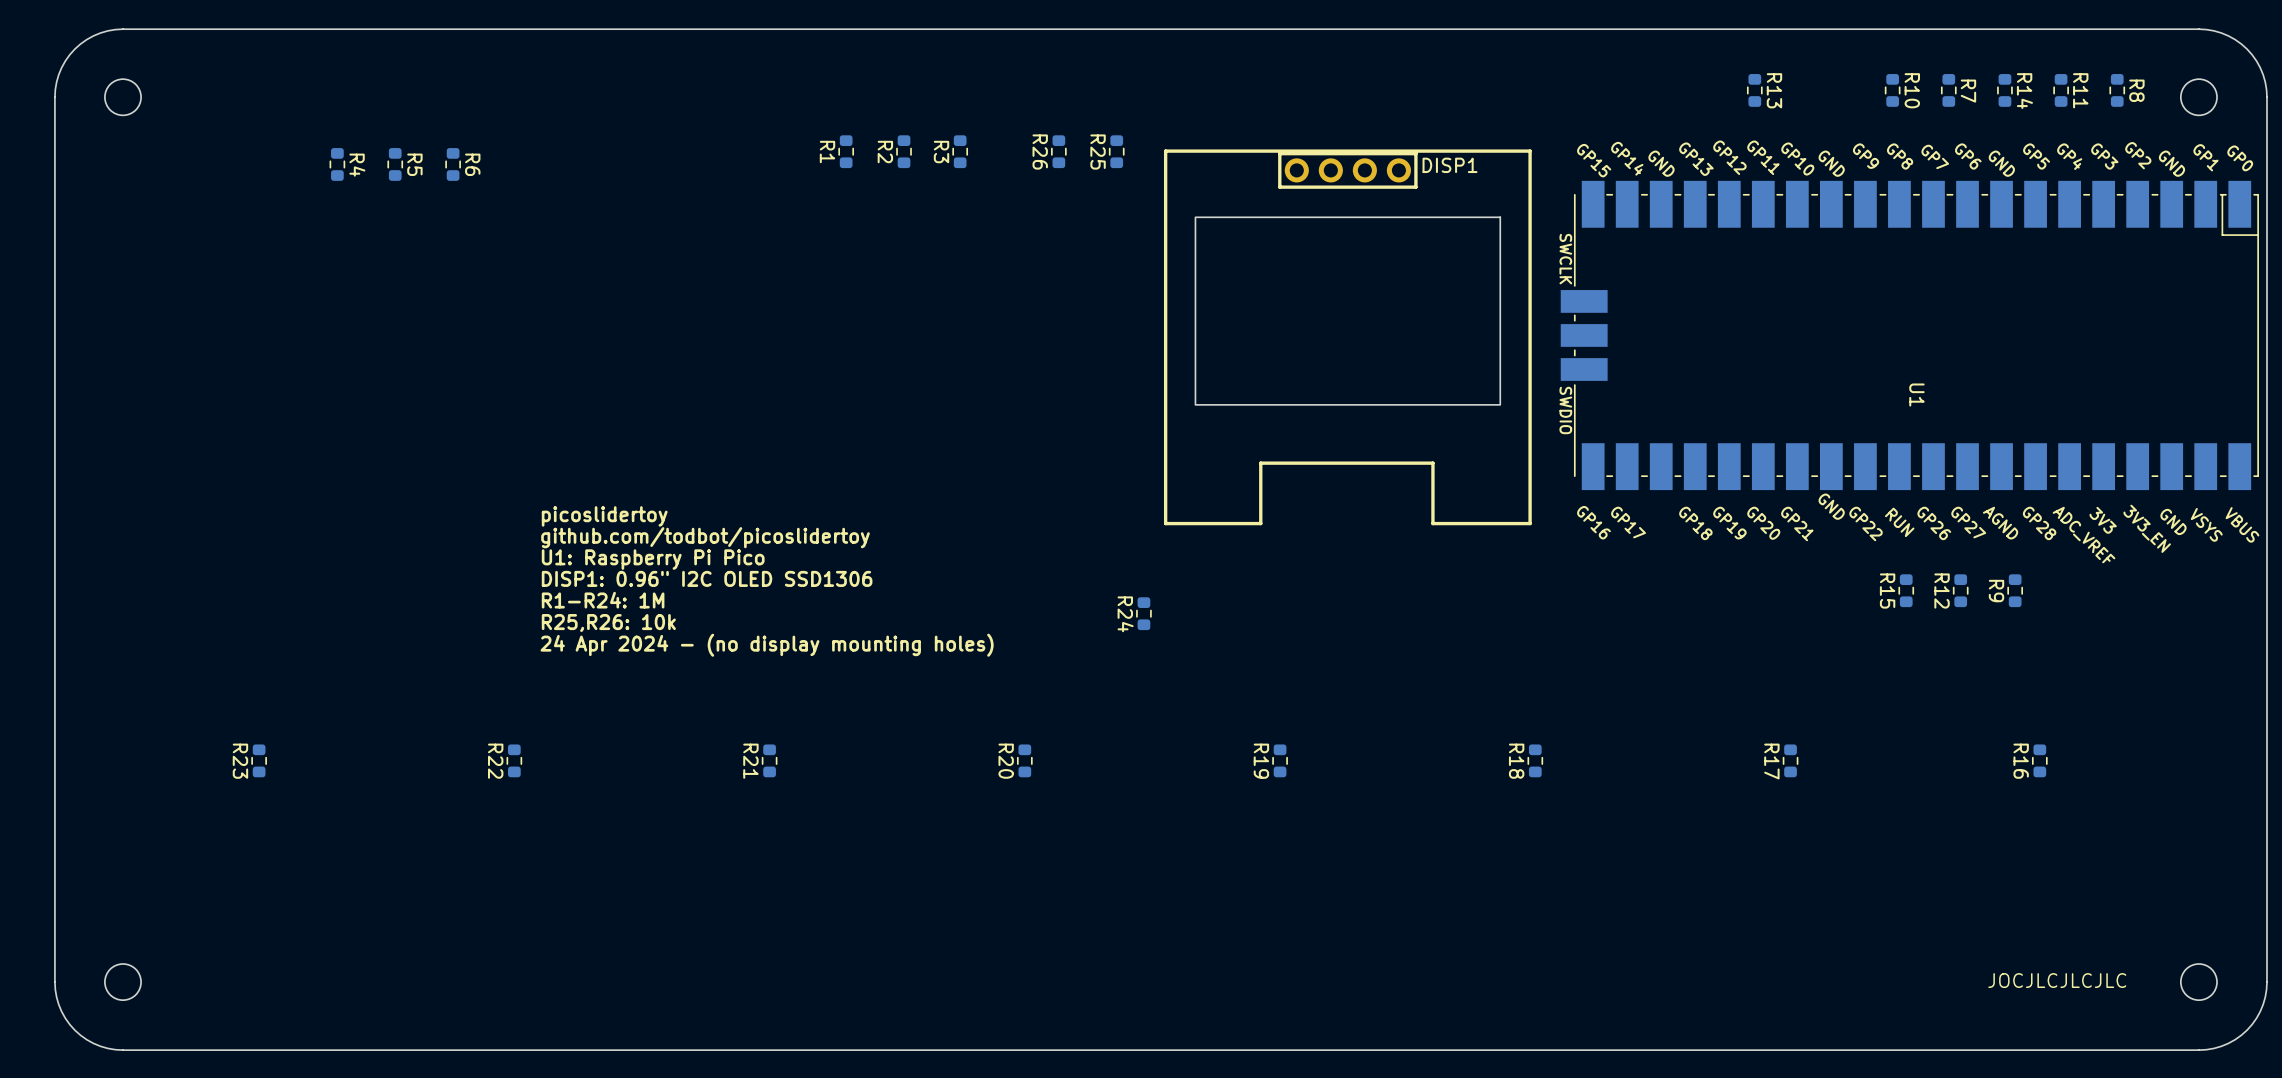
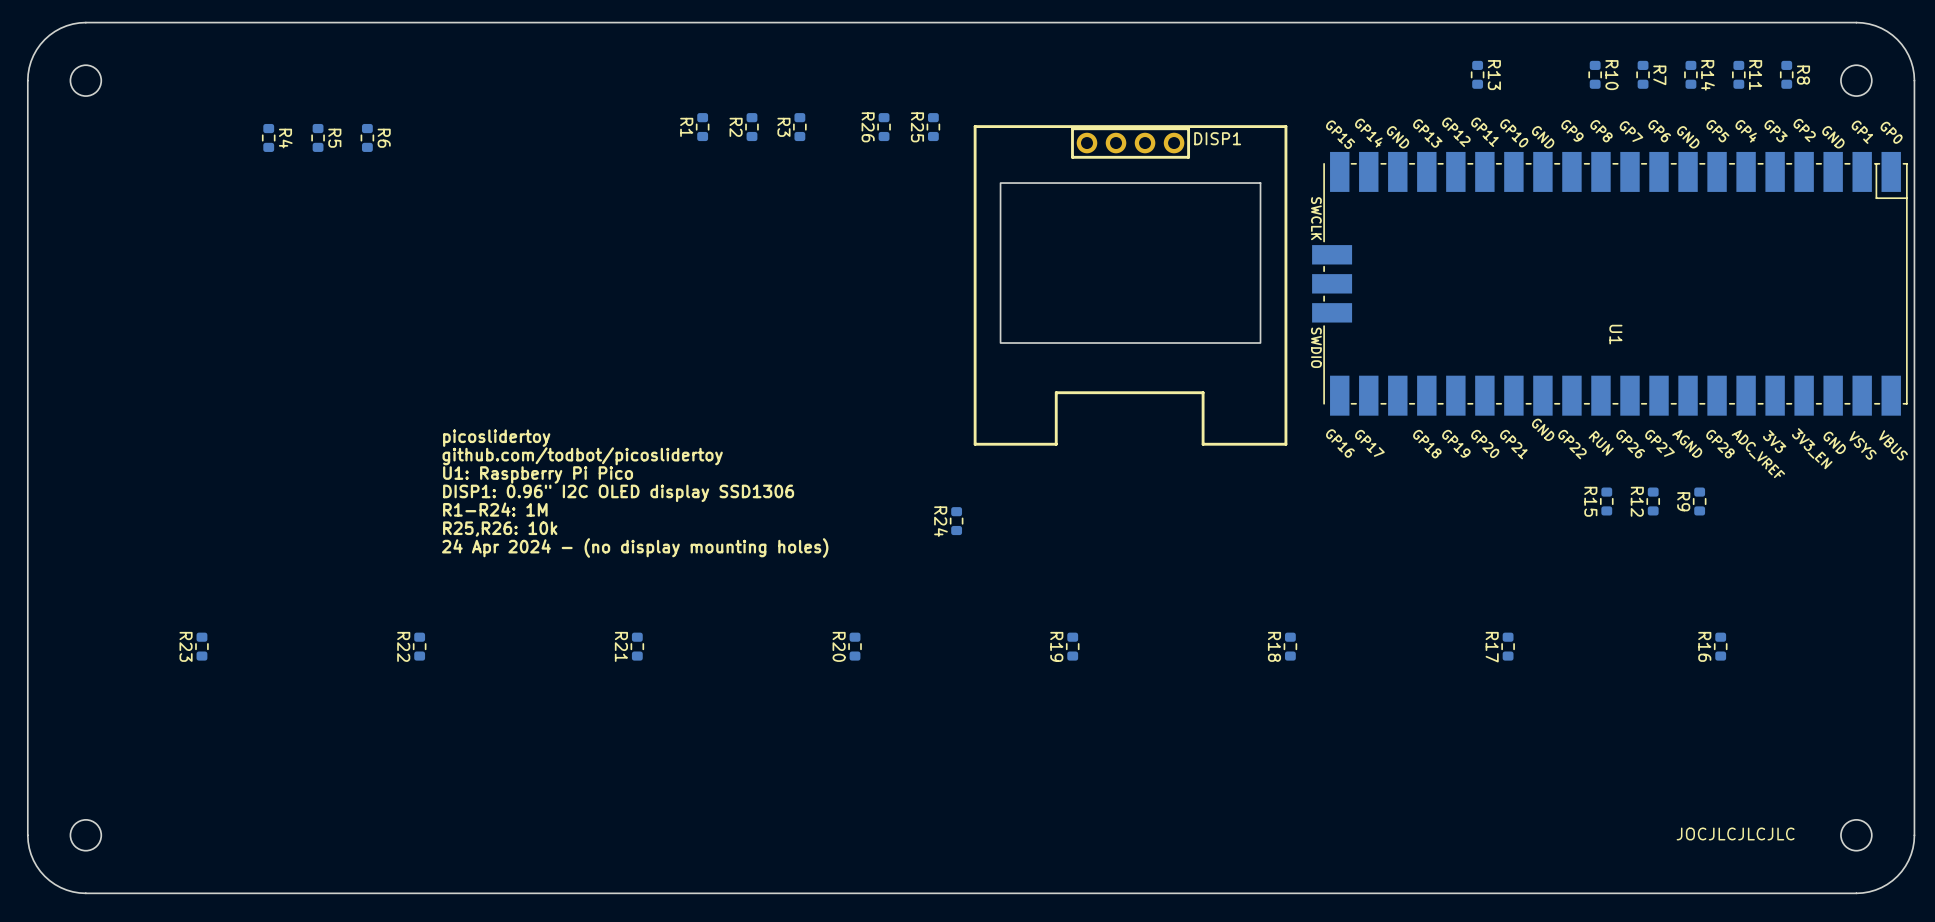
text: DISP1: 0.96" I2C OLED SSD1306 (707, 578) -> DISP1: 0.96" I2C OLED display SSD1306 (618, 493)

